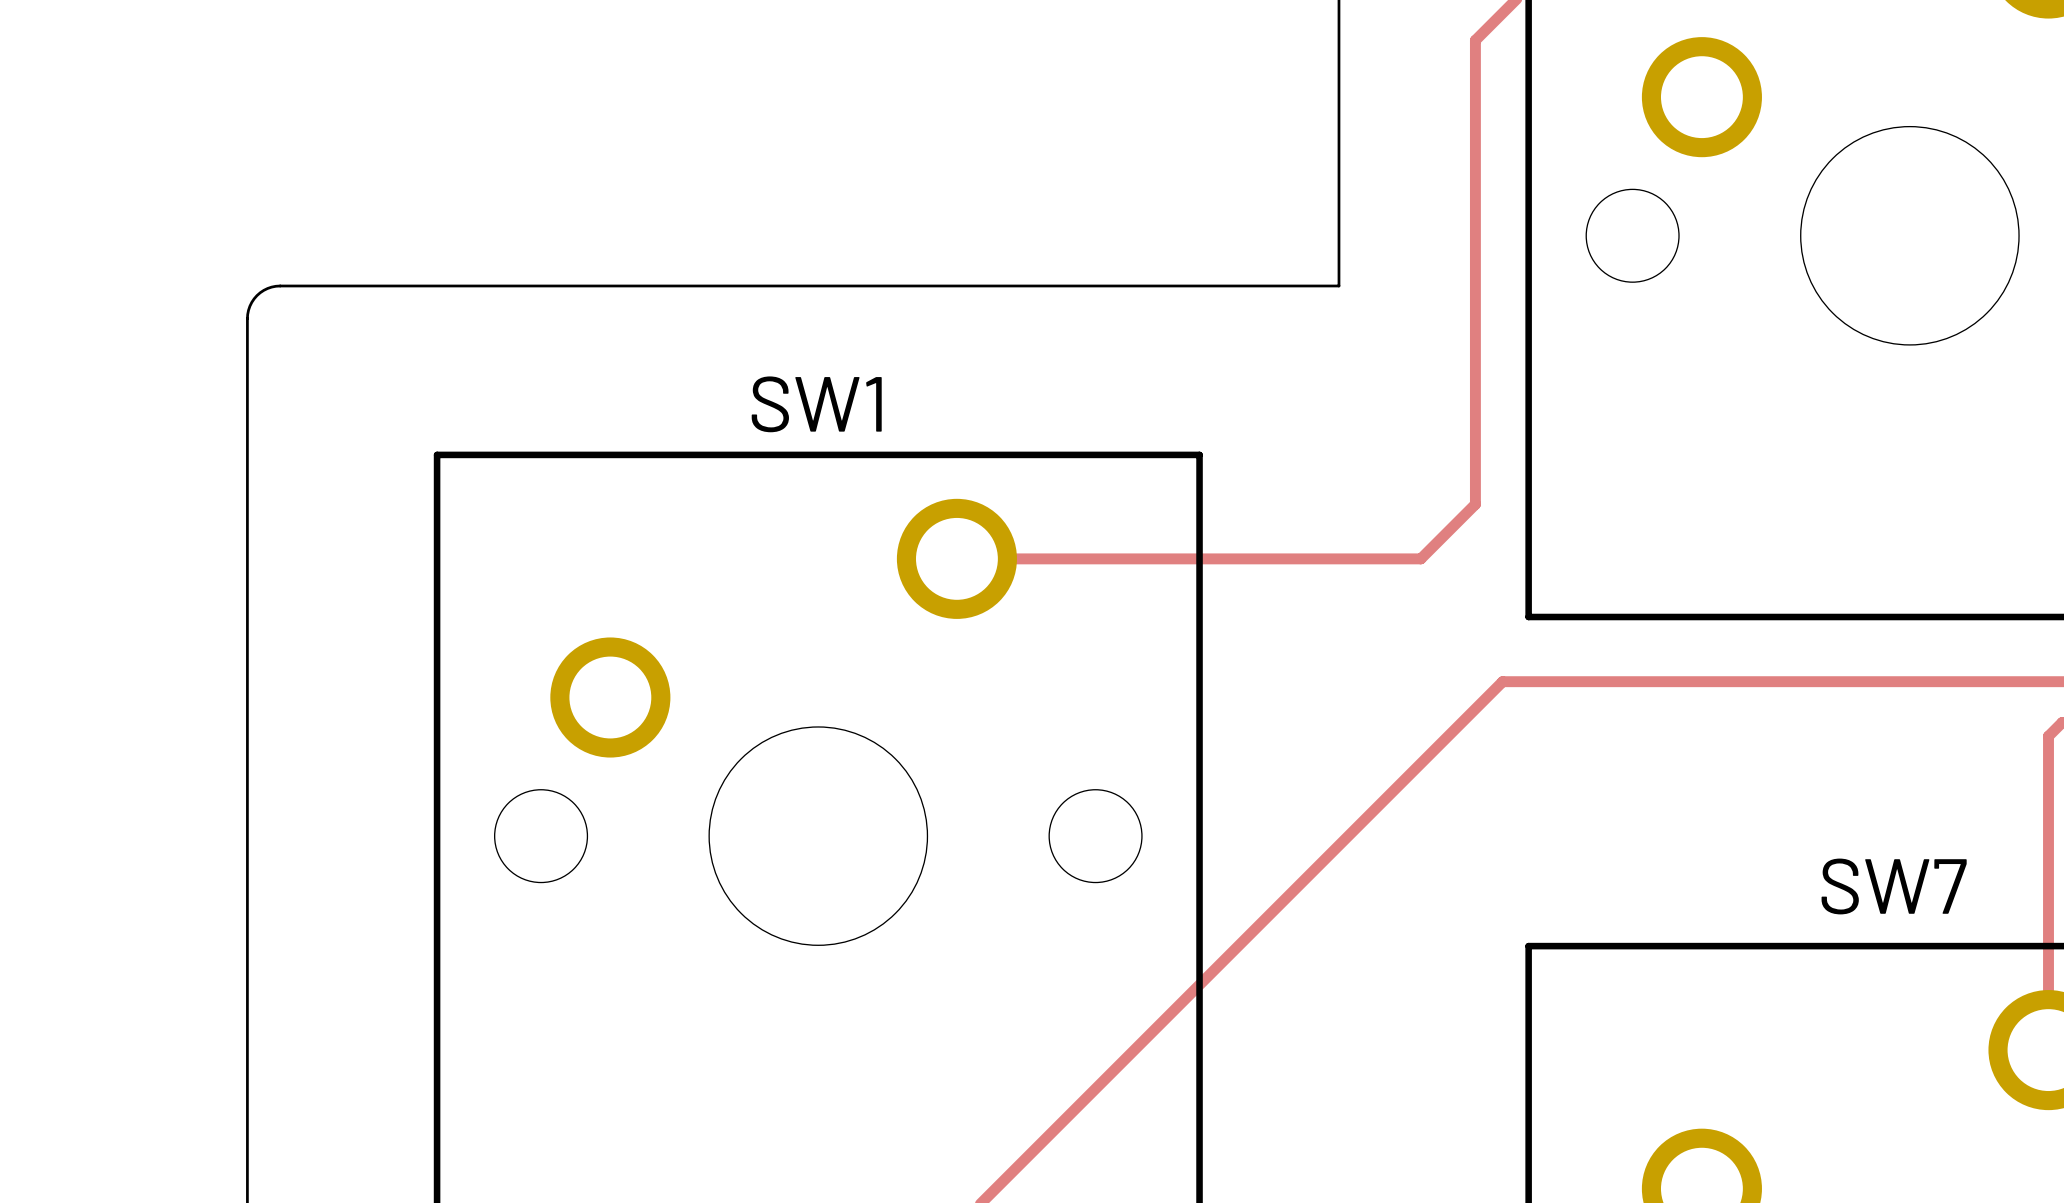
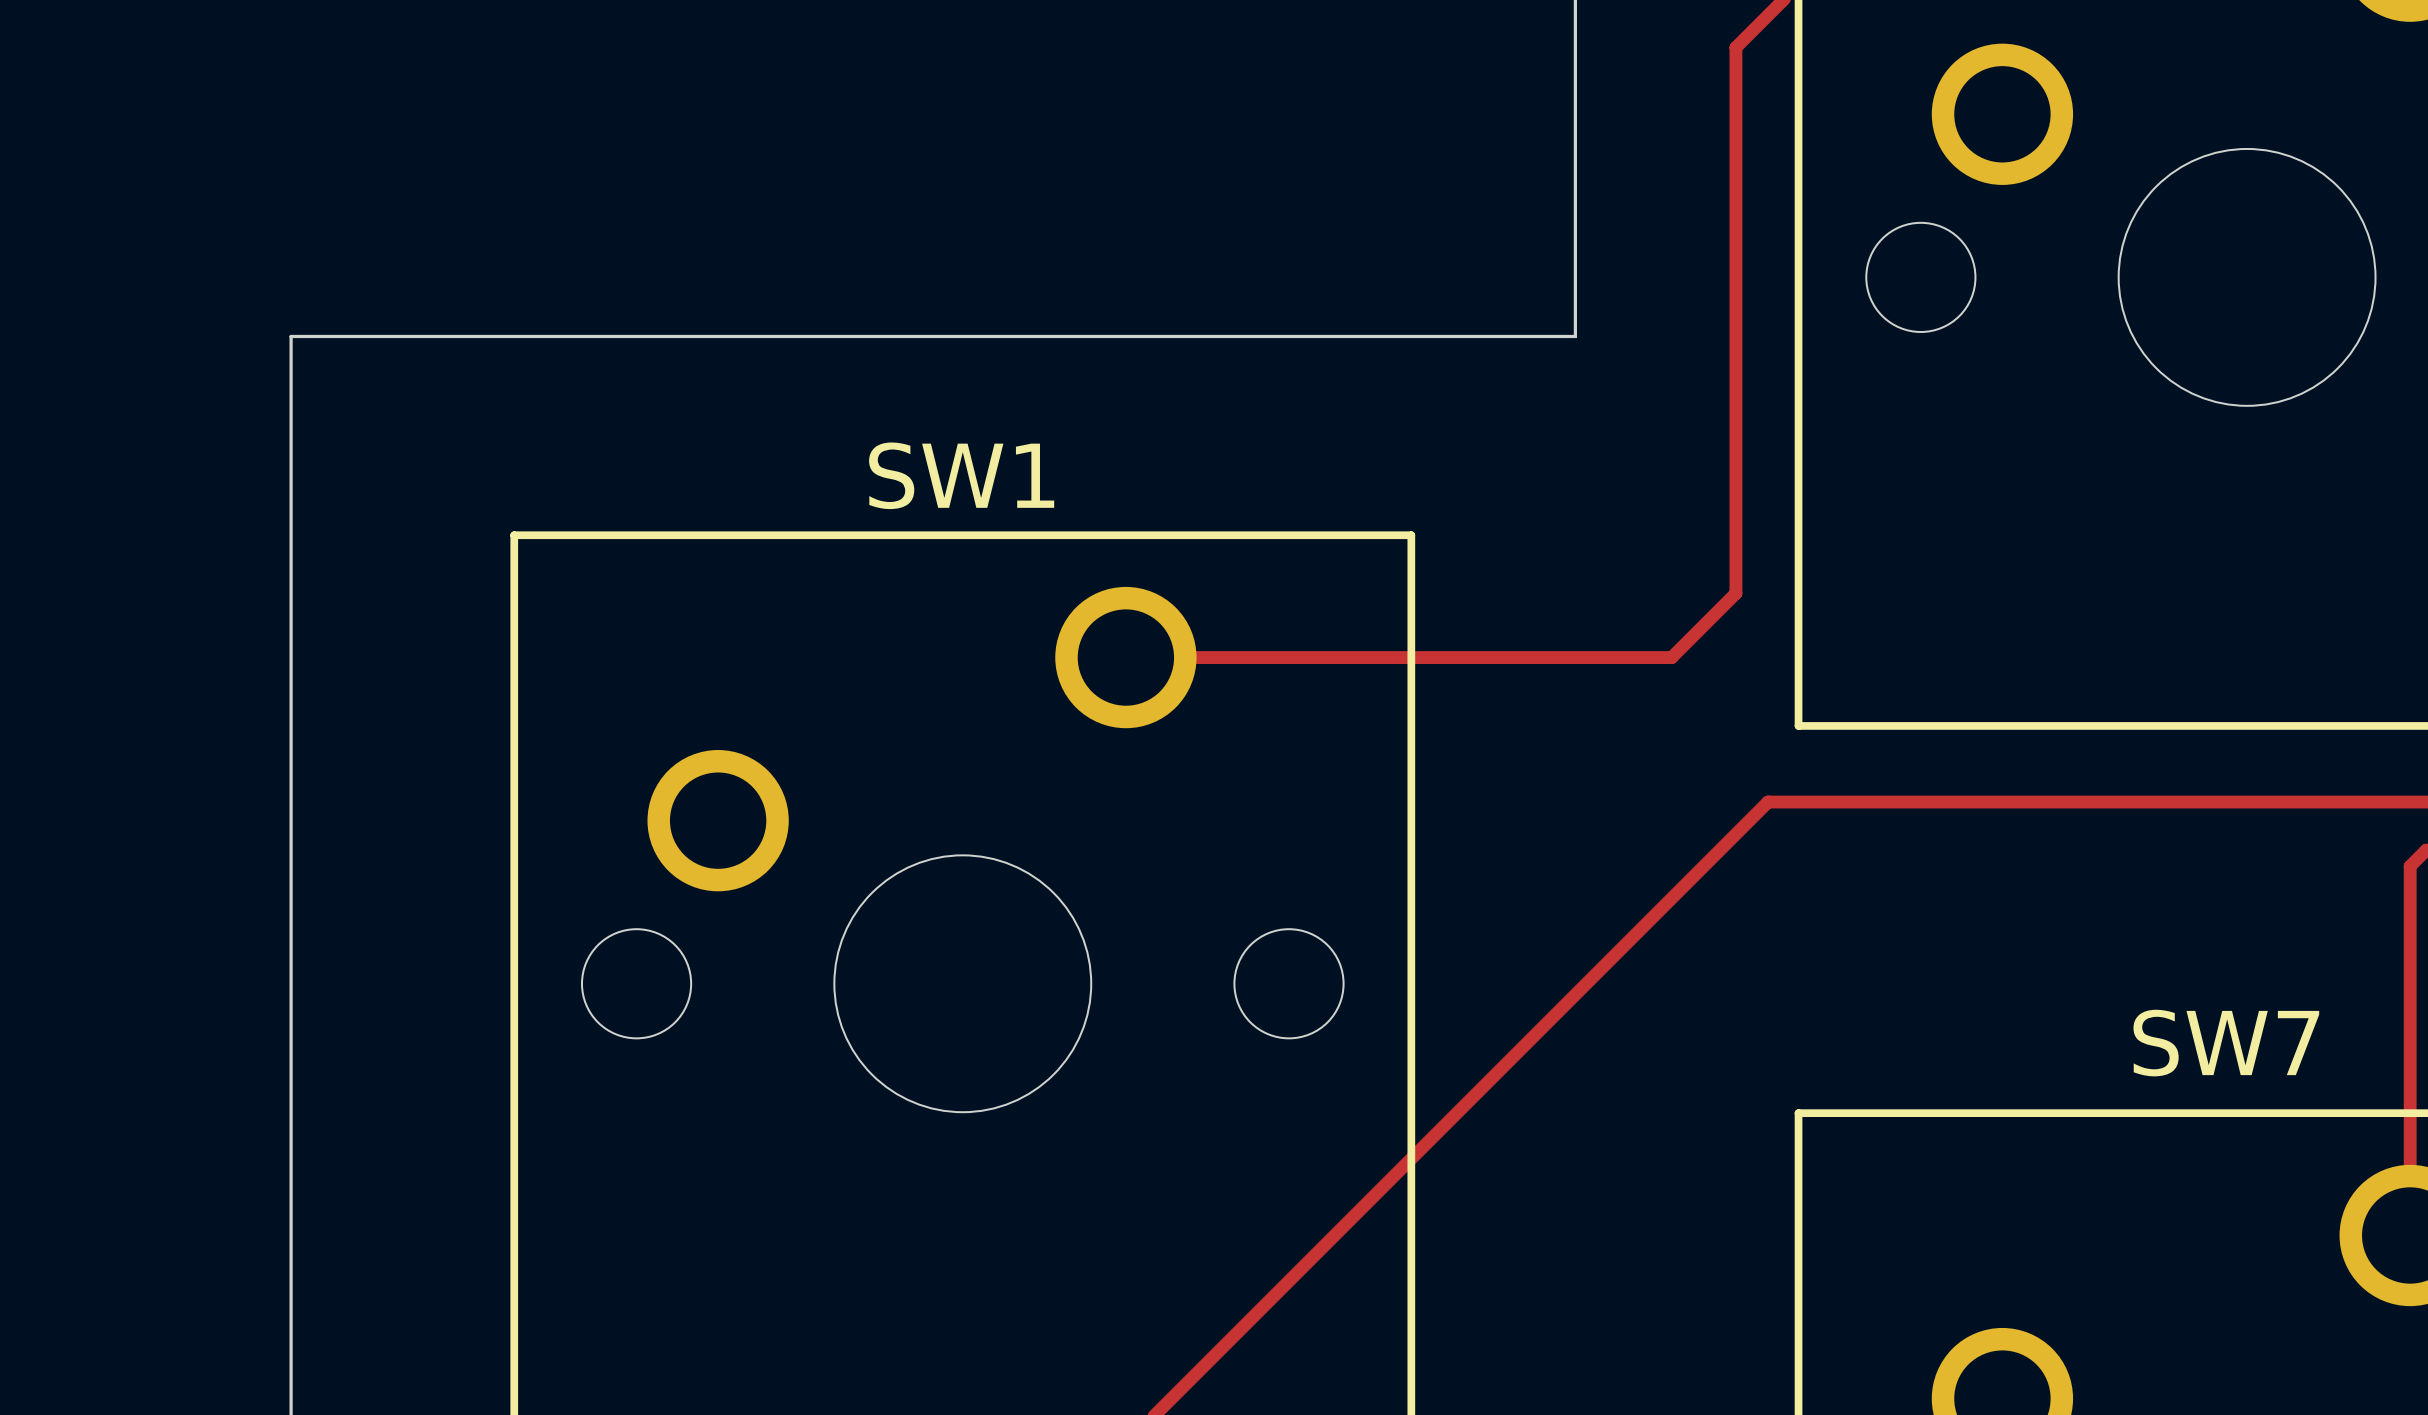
board edge: (280, 285) (267, 288) (257, 295) (249, 306) (247, 318) -> (329, 336) (291, 336) (291, 375)

